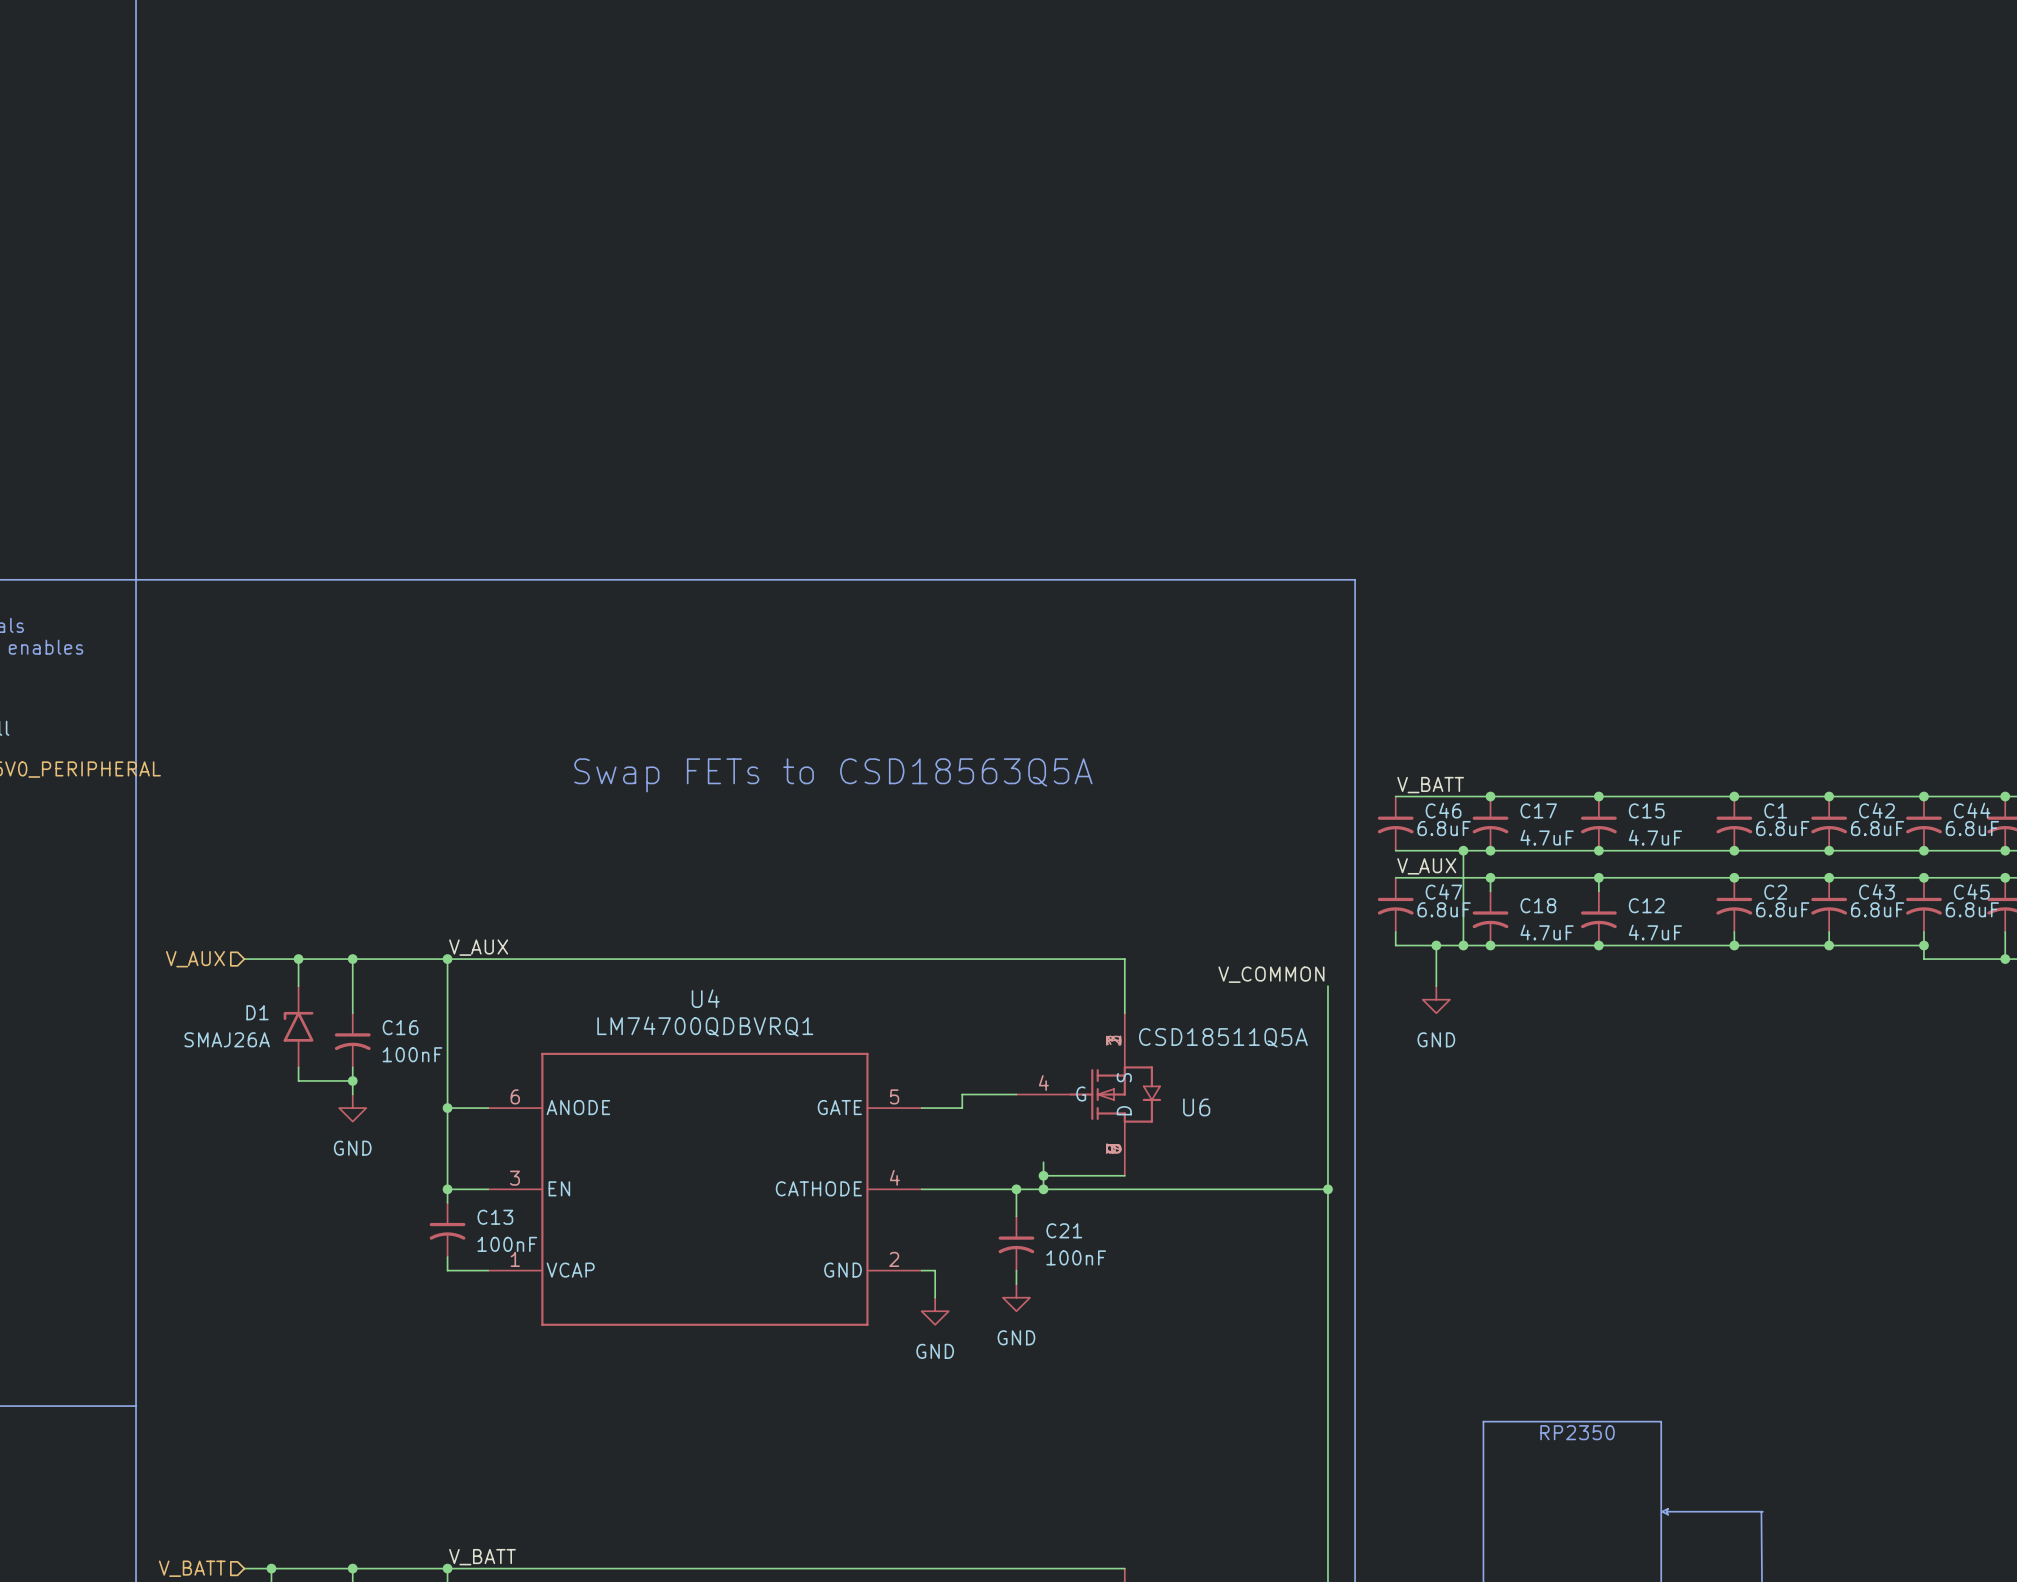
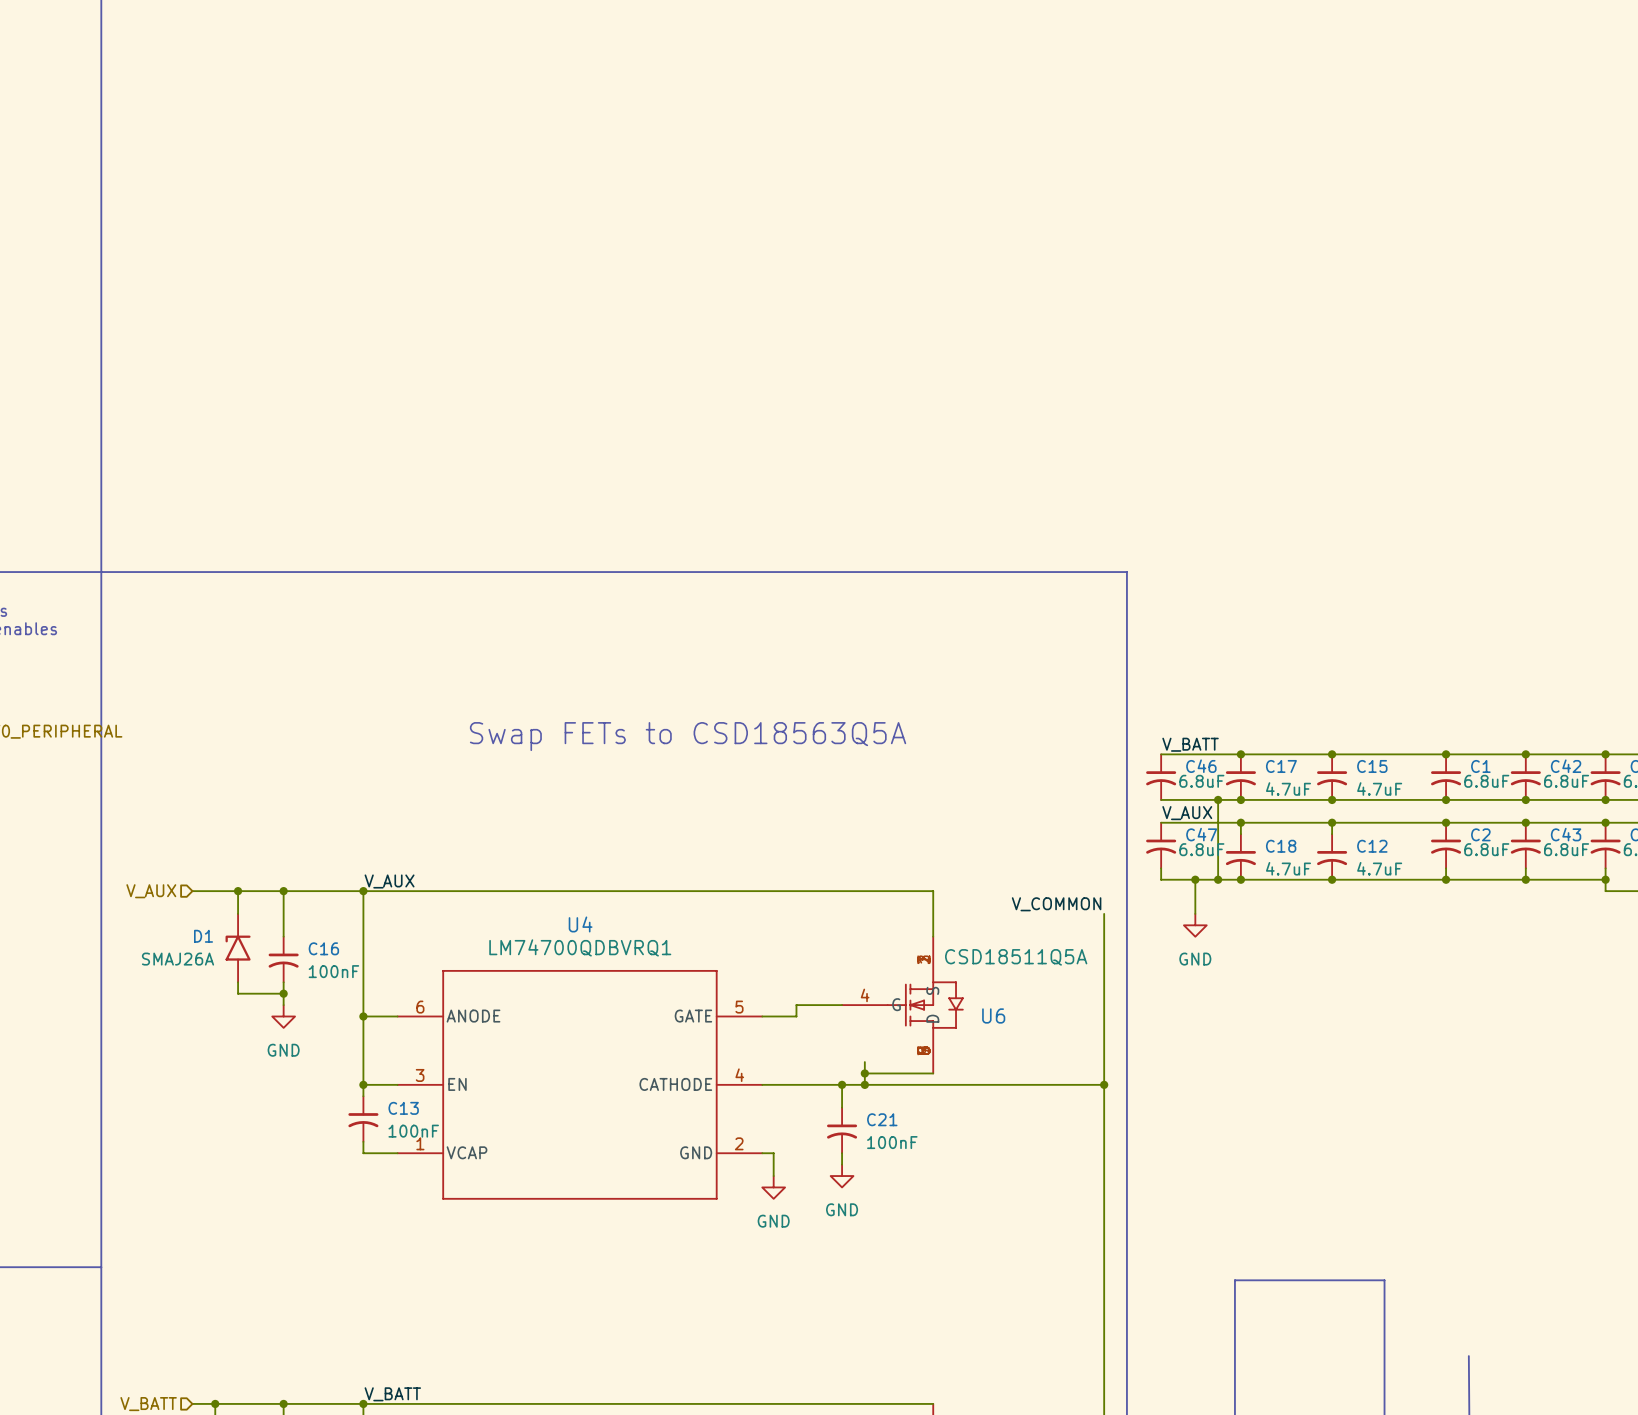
text: RP2350 (1577, 1432) -> none
line: (1666, 1511) (1668, 1514) (1662, 1511) (1668, 1508) (1666, 1511) -> none
line: (1666, 1511) (1762, 1511) -> none

